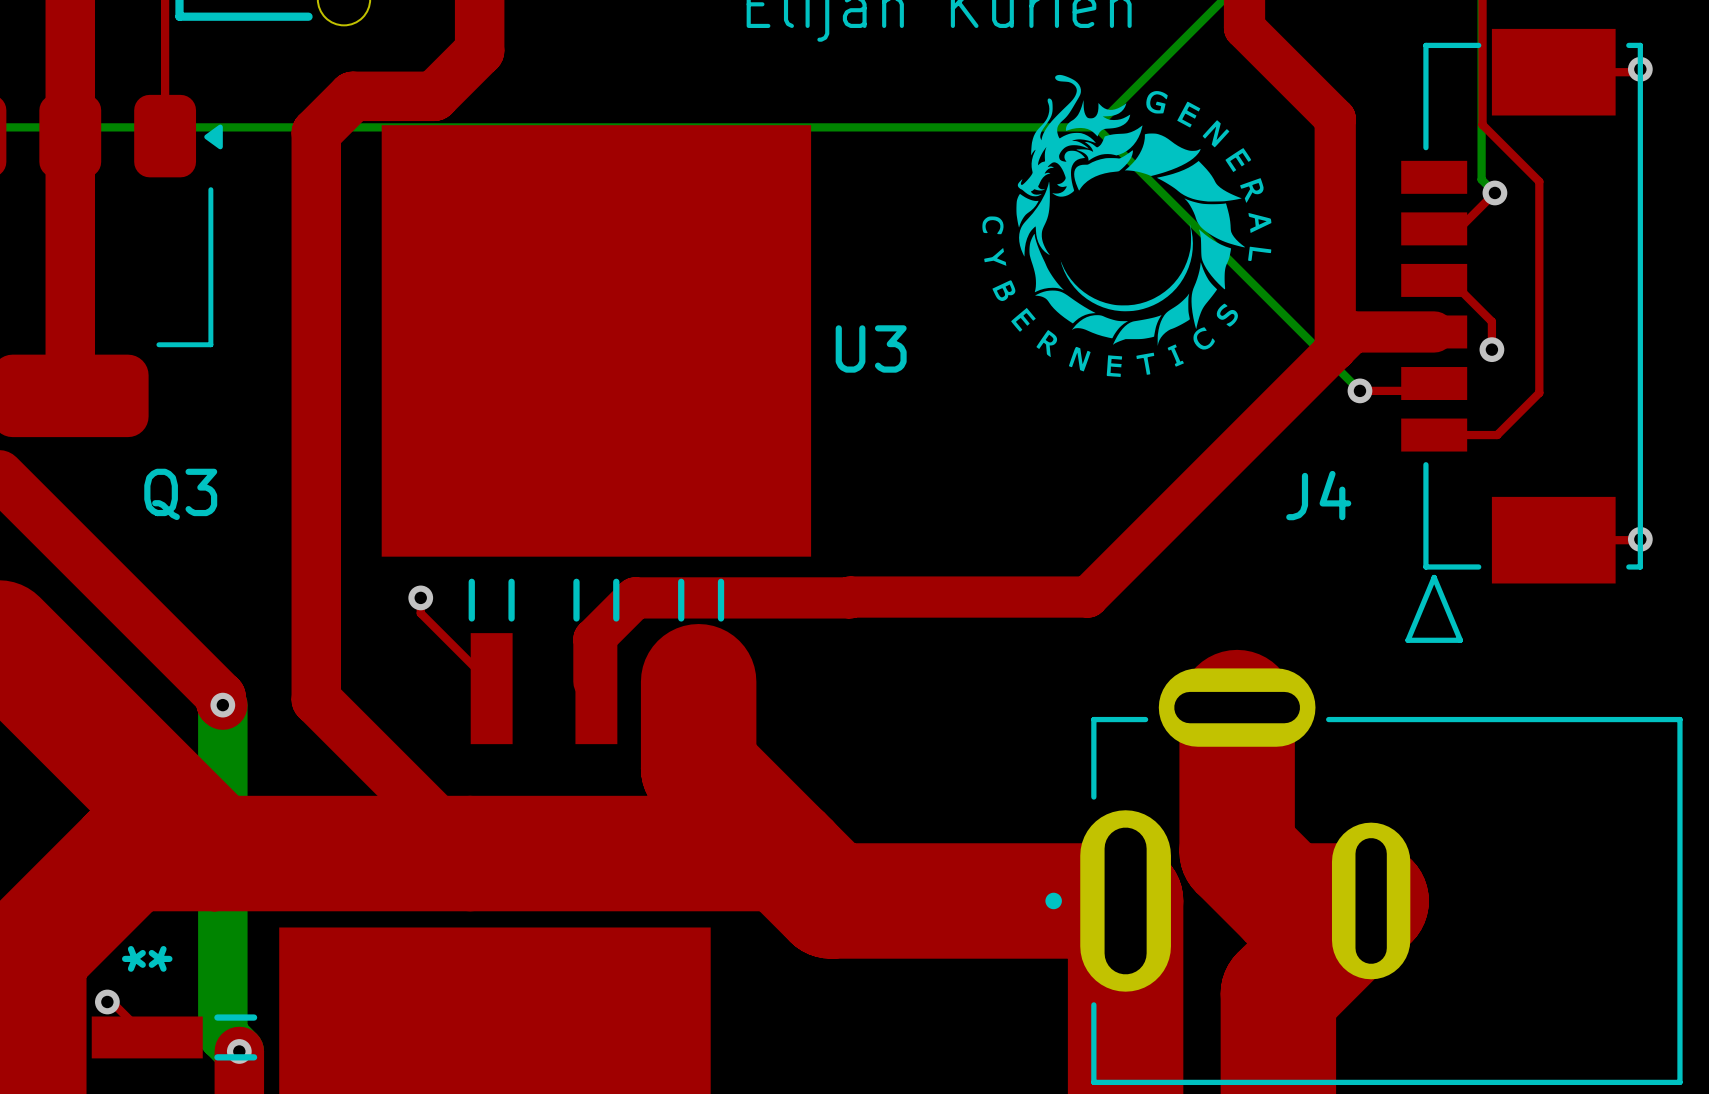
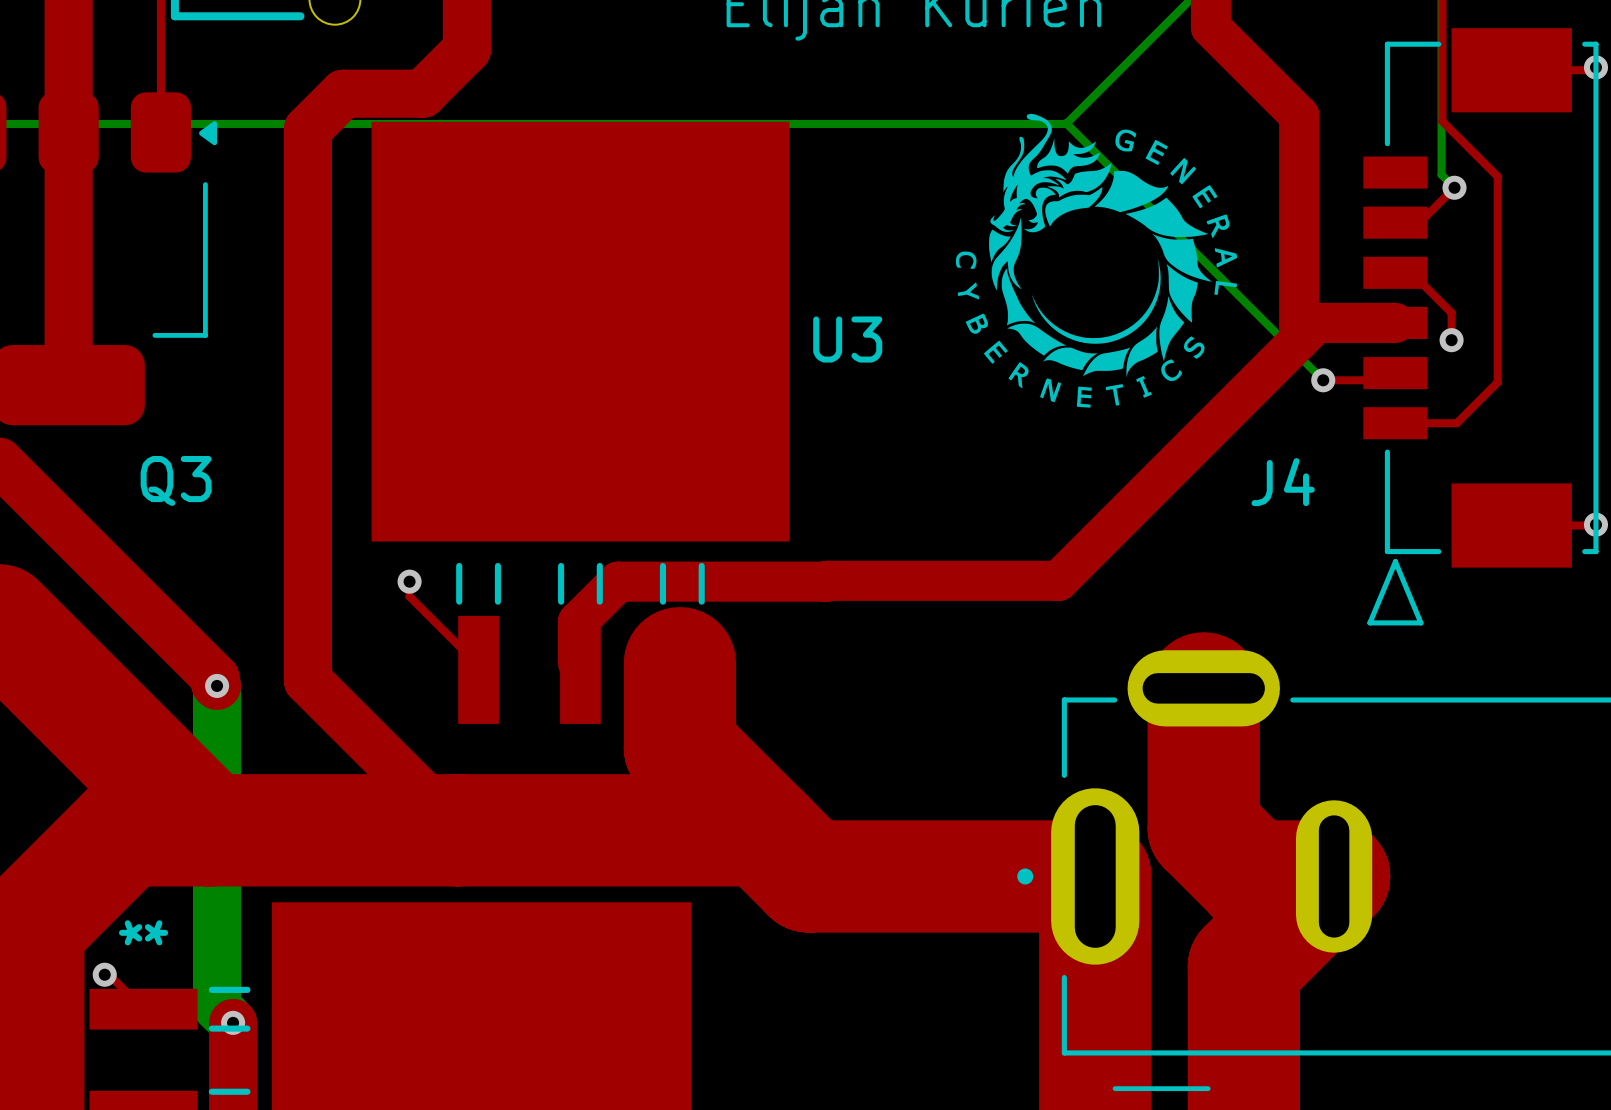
drawing position: (1126, 225) -> (1096, 260)

